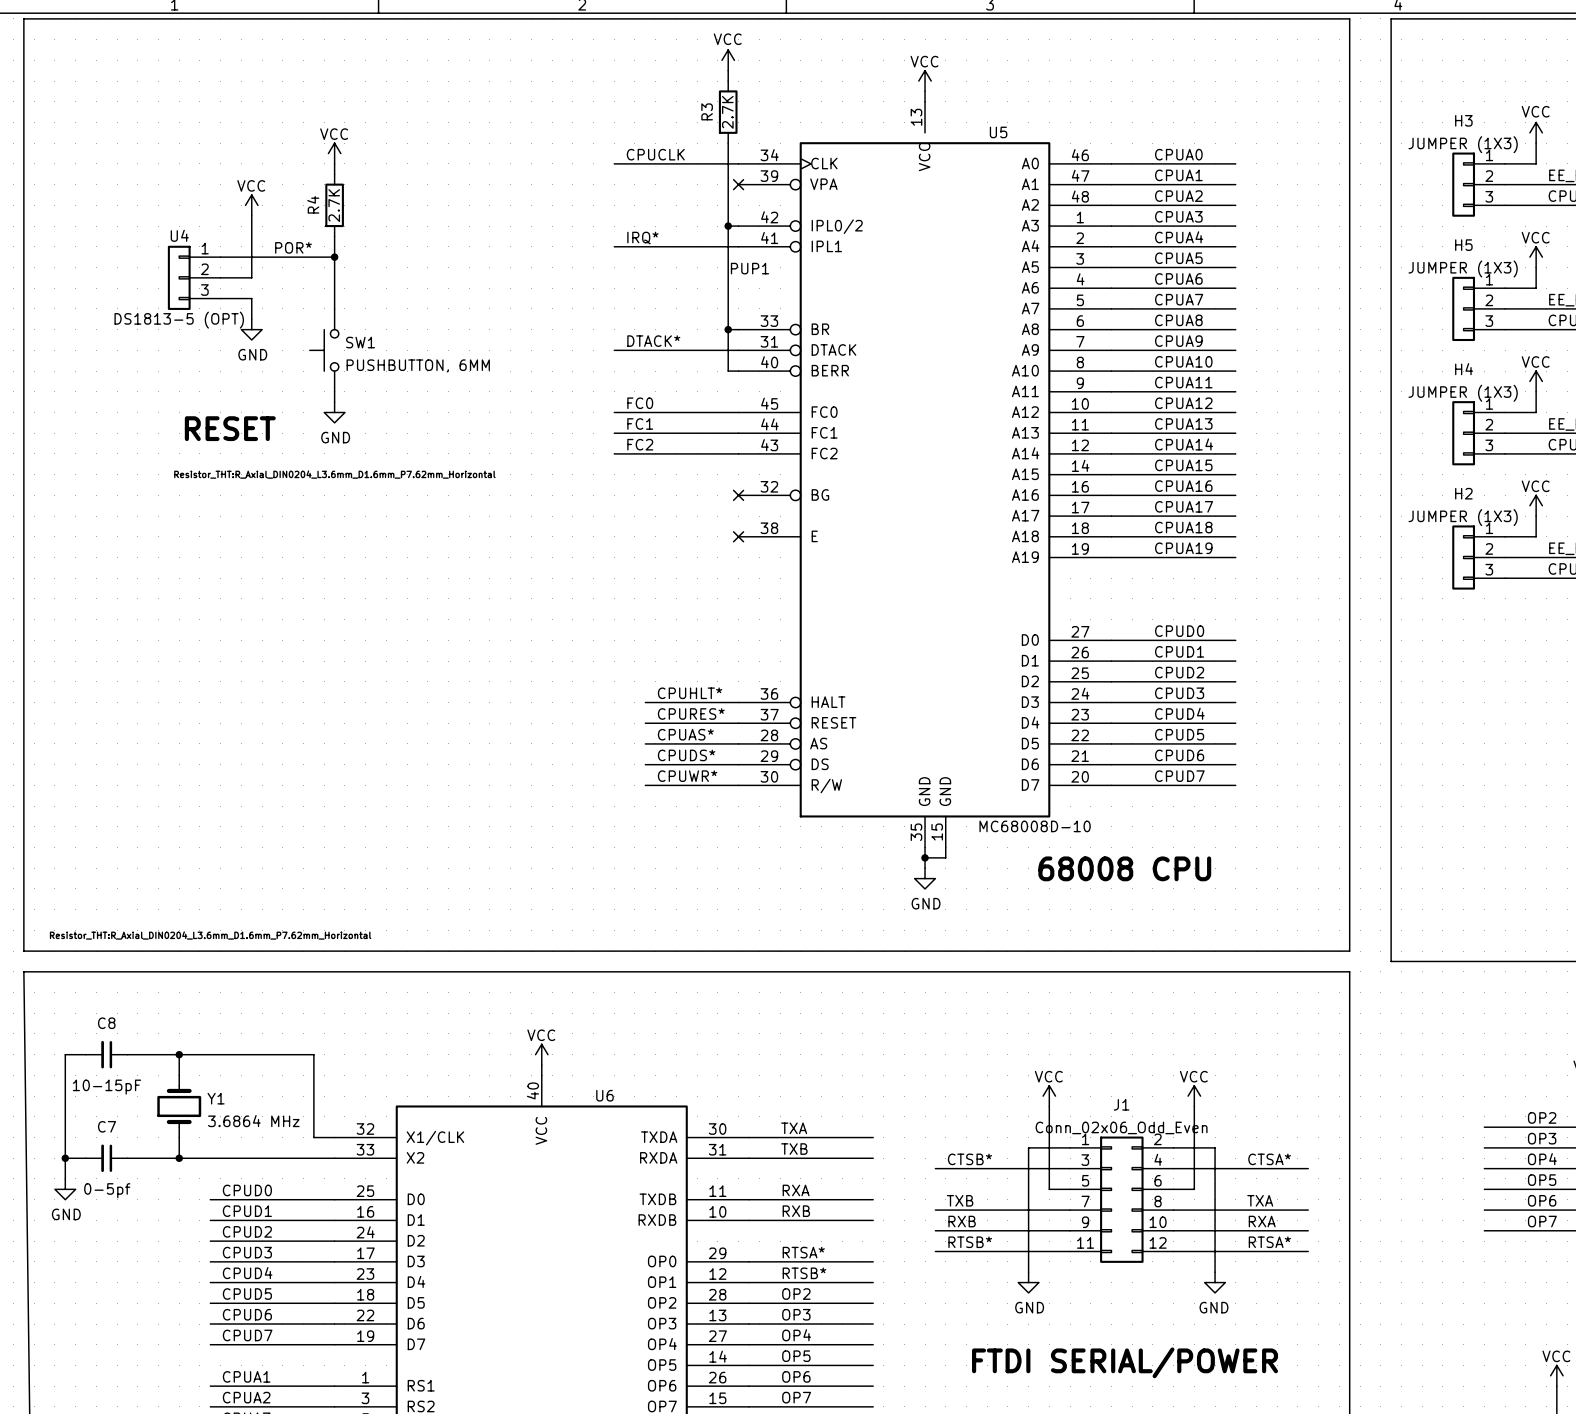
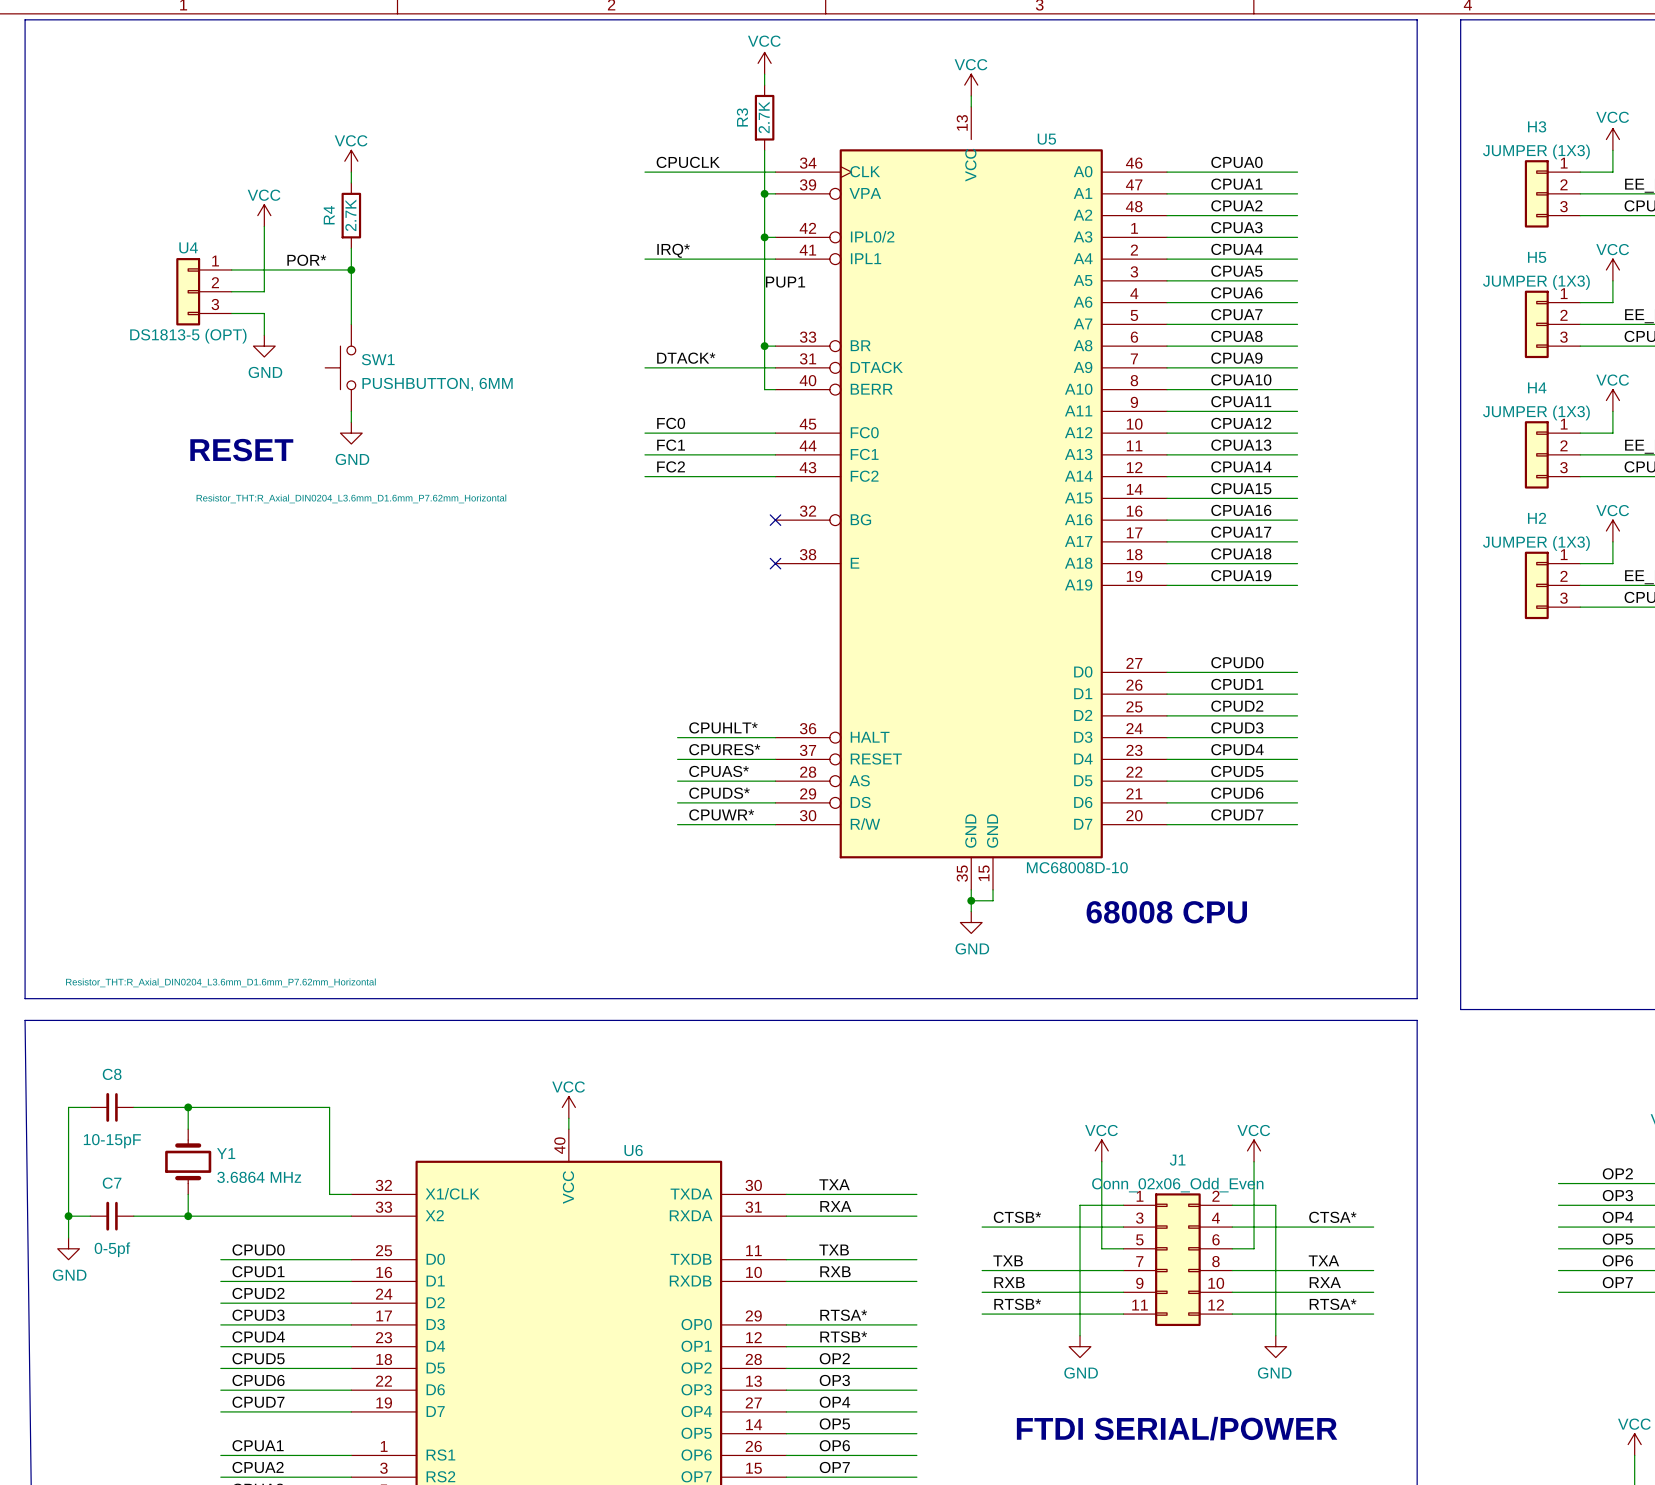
wire: none -> (764, 193) (775, 193)
junction: none -> (764, 193)
no-connect mark: (738, 184) -> none
label: TXB (794, 1149) -> RXA (835, 1206)
label: RXA (796, 1190) -> TXB (834, 1249)

